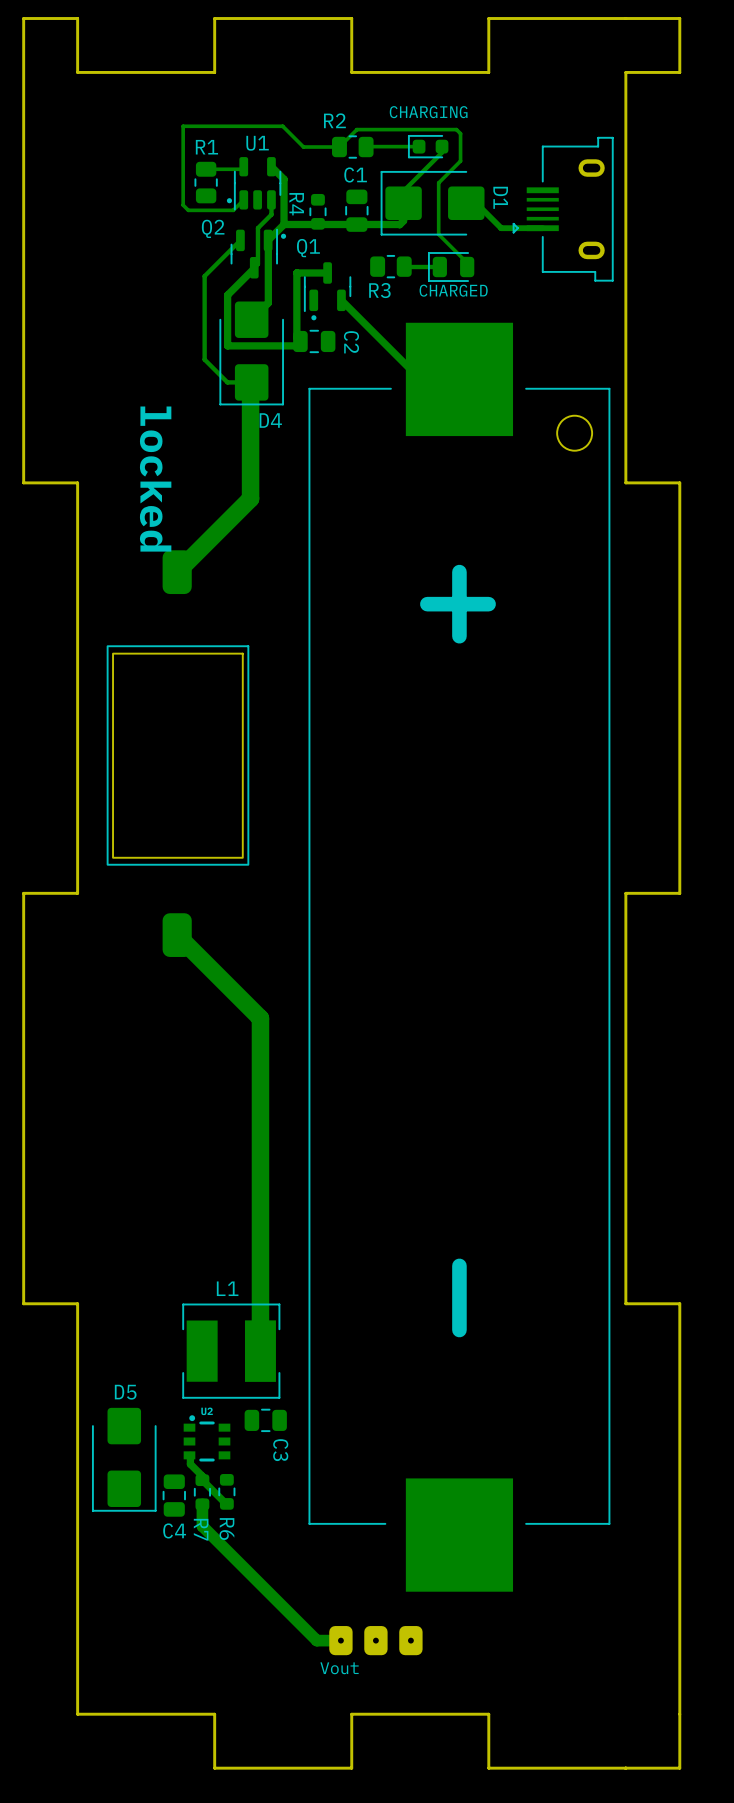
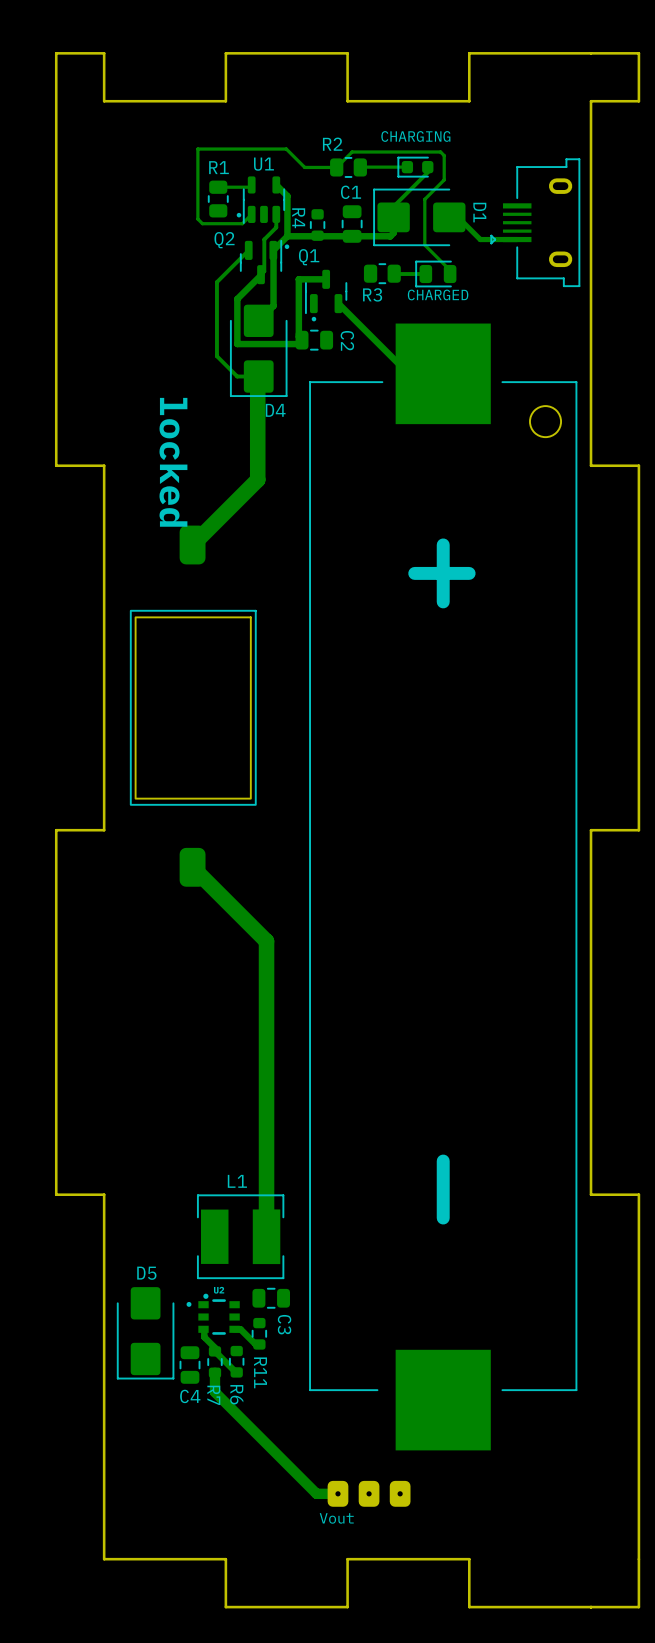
drawing: none -> [186, 1301, 192, 1307]
track: none -> (233, 1329) (240, 1329) (255, 1344) (259, 1344)
R11: none -> (259, 1333)

